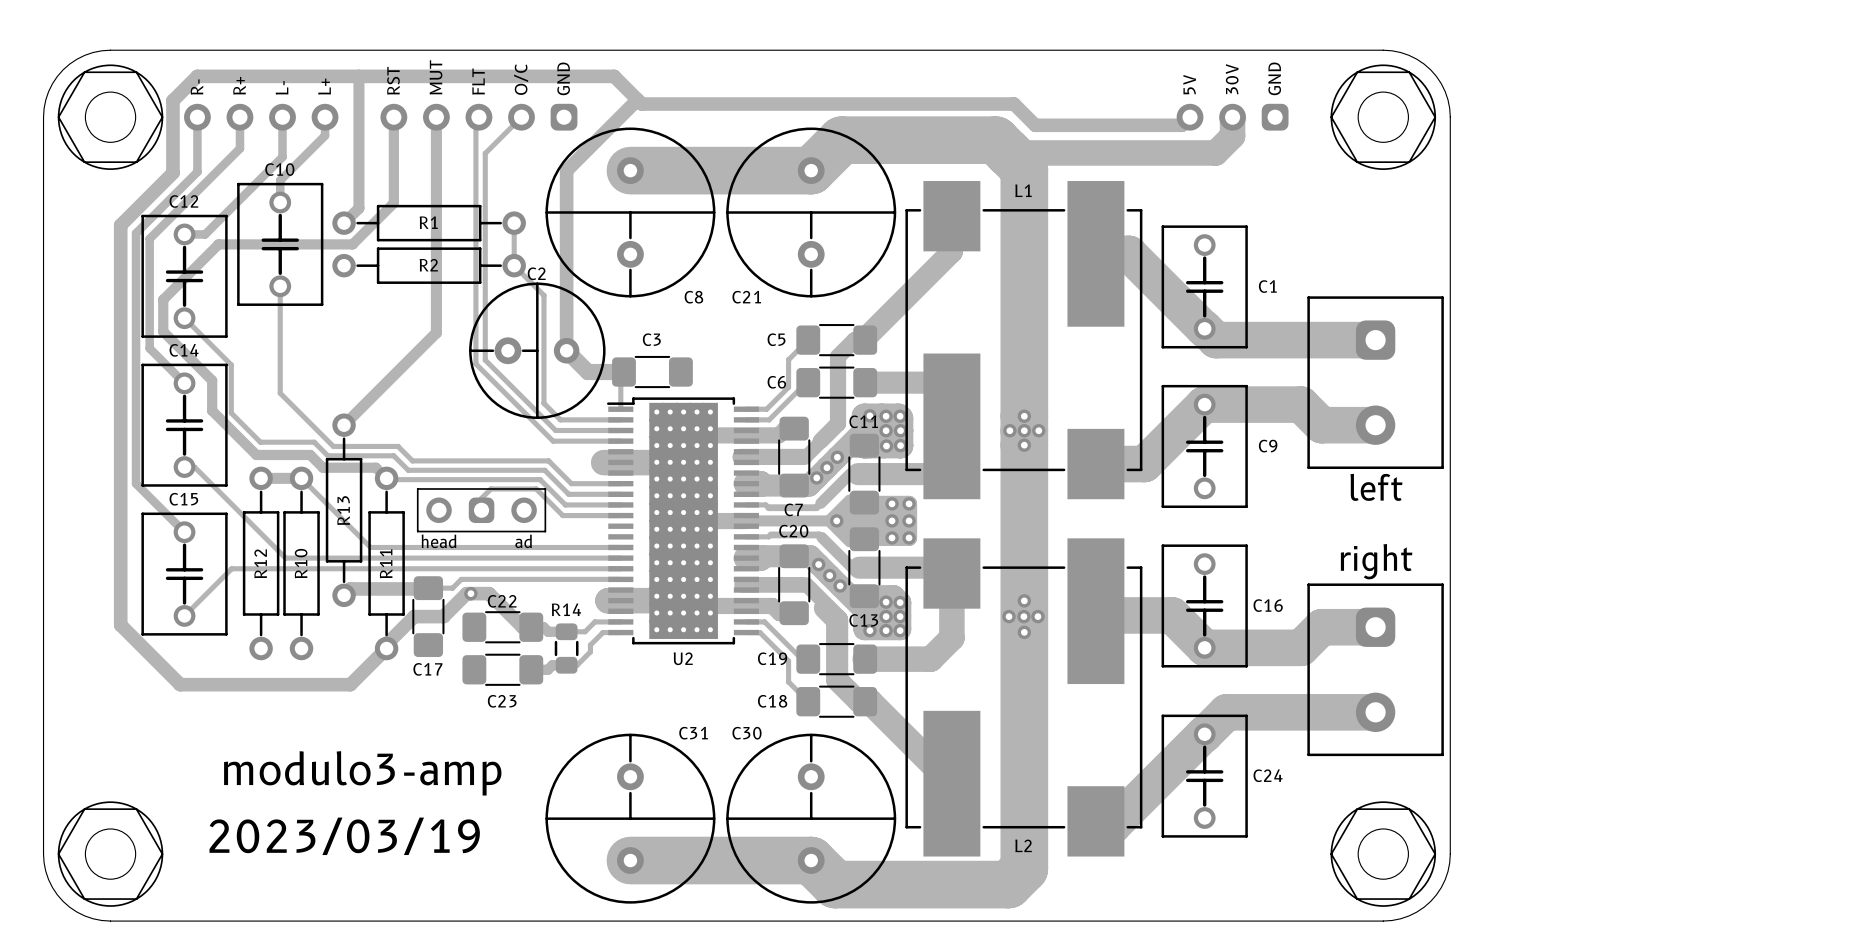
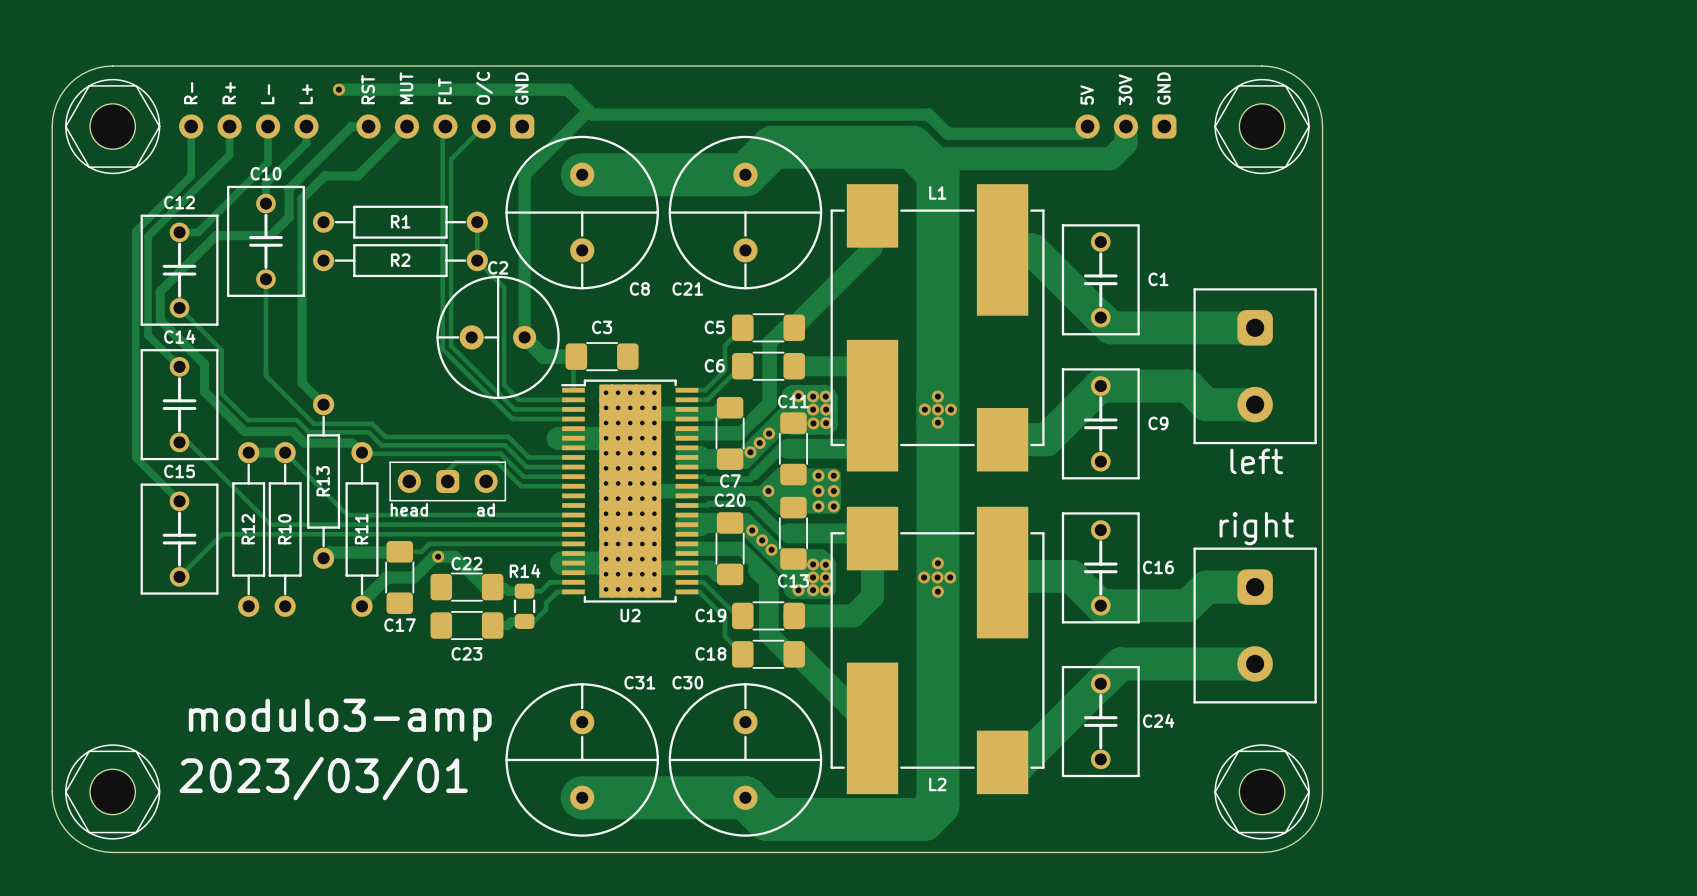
track: (358, 76) (358, 208) (344, 223) -> none
track: (361, 76) (197, 76) (172, 100) (172, 173) (120, 225) (120, 625) (180, 684) (350, 684) (386, 648) -> none
via: none -> (338, 89)
track: (393, 117) (393, 203) (352, 244) (218, 244) -> (368, 126) (351, 126) (289, 188) (289, 217) (270, 235) (216, 235) (210, 241)
track: (436, 117) (436, 332) (344, 425) -> (407, 126) (357, 176) (324, 176) (302, 198) (302, 383) (323, 404)
text: 2023/03/19 (344, 836) -> 2023/03/01 (323, 778)

